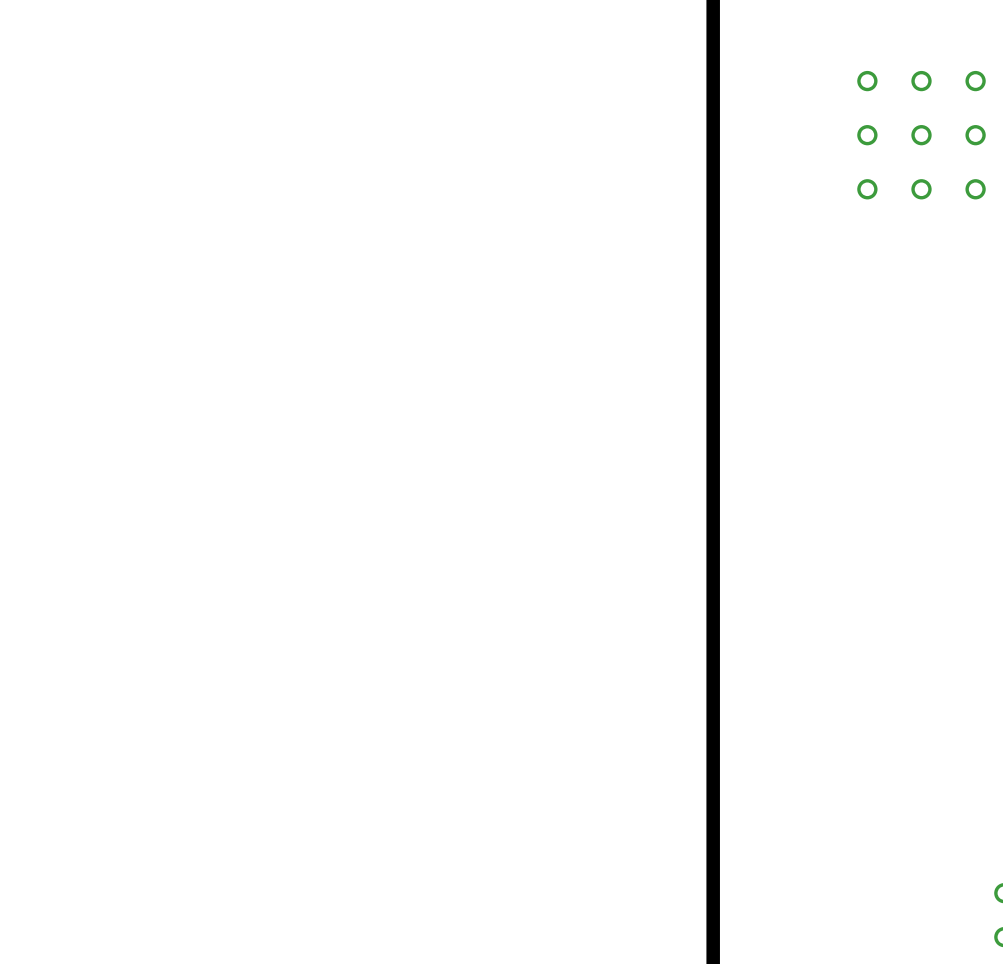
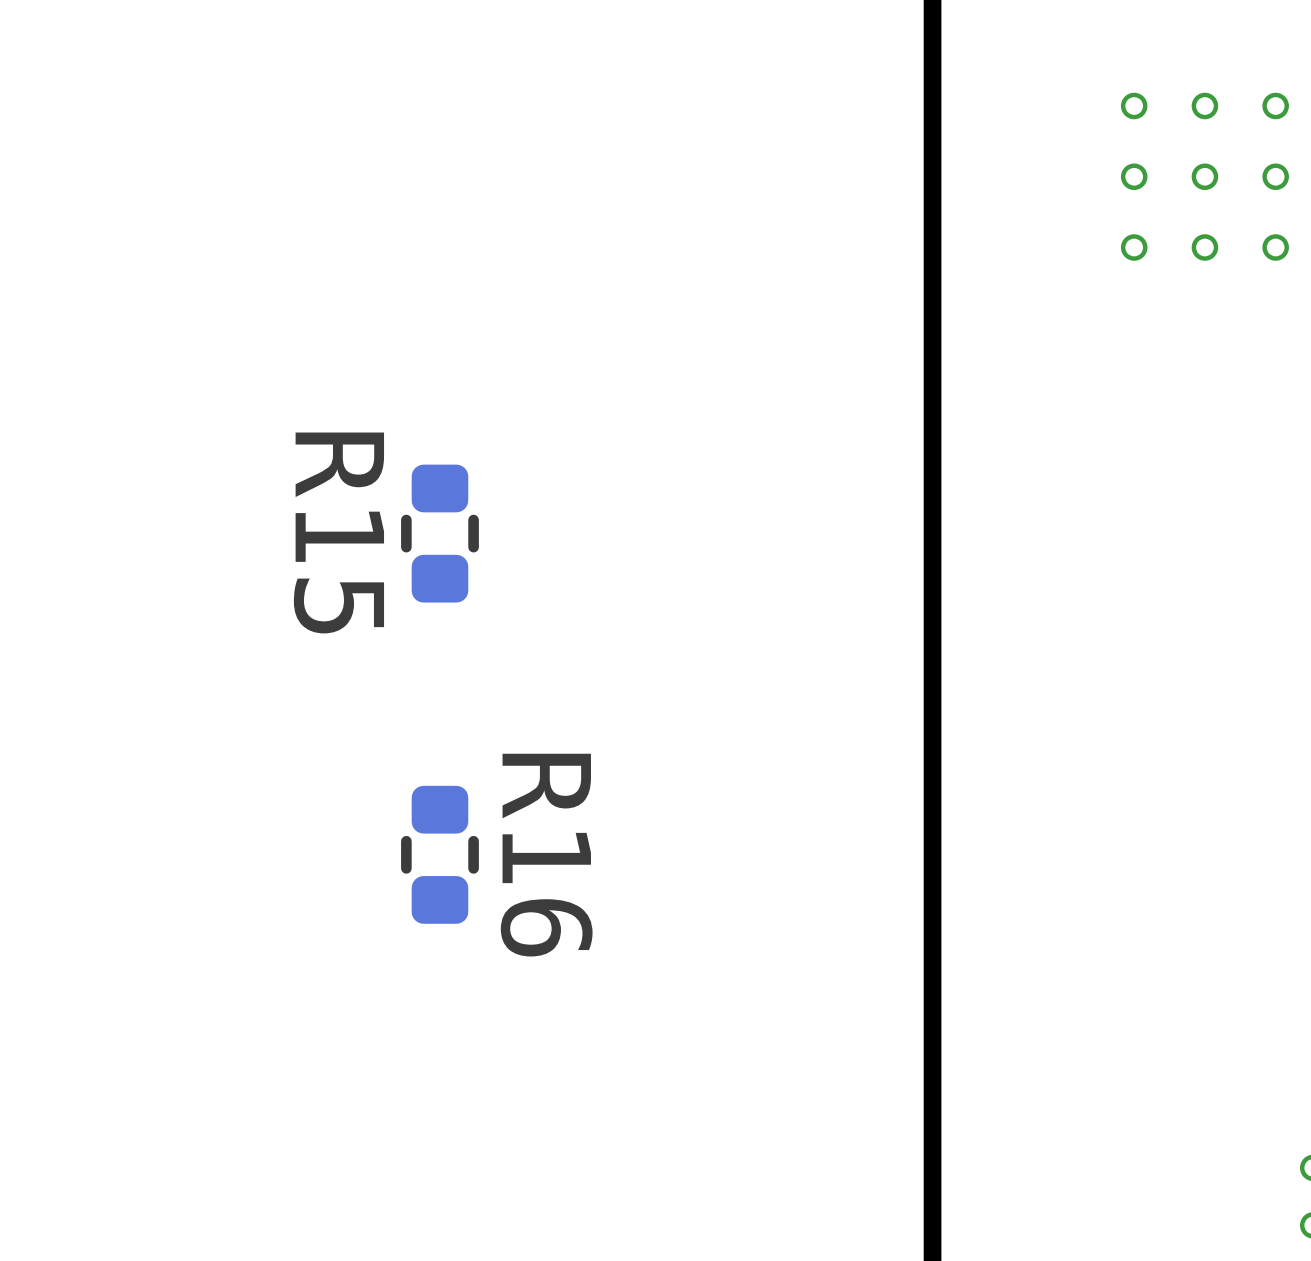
R15: none -> (439, 533)
R16: none -> (439, 854)

